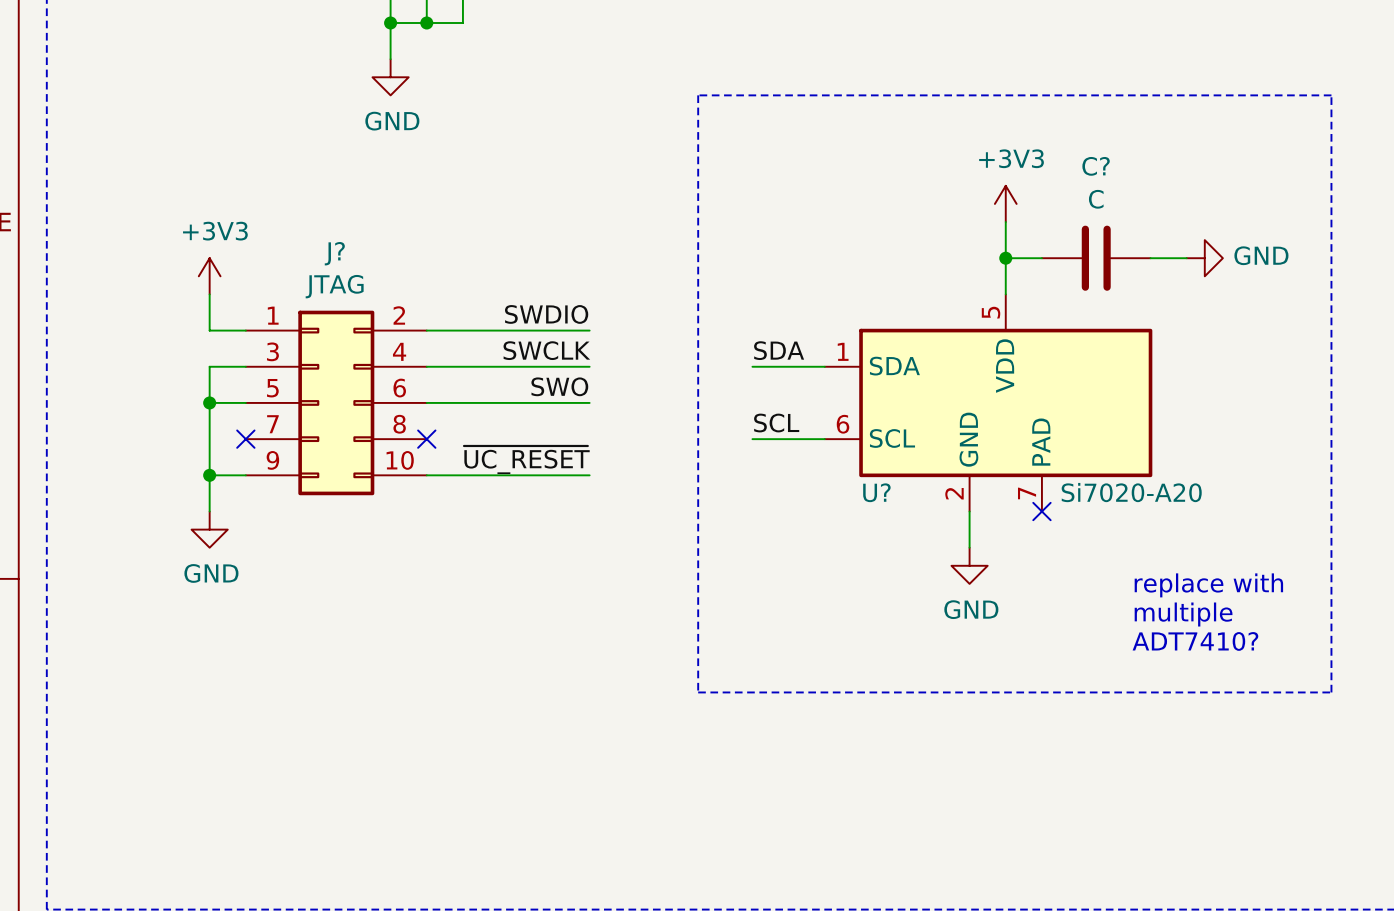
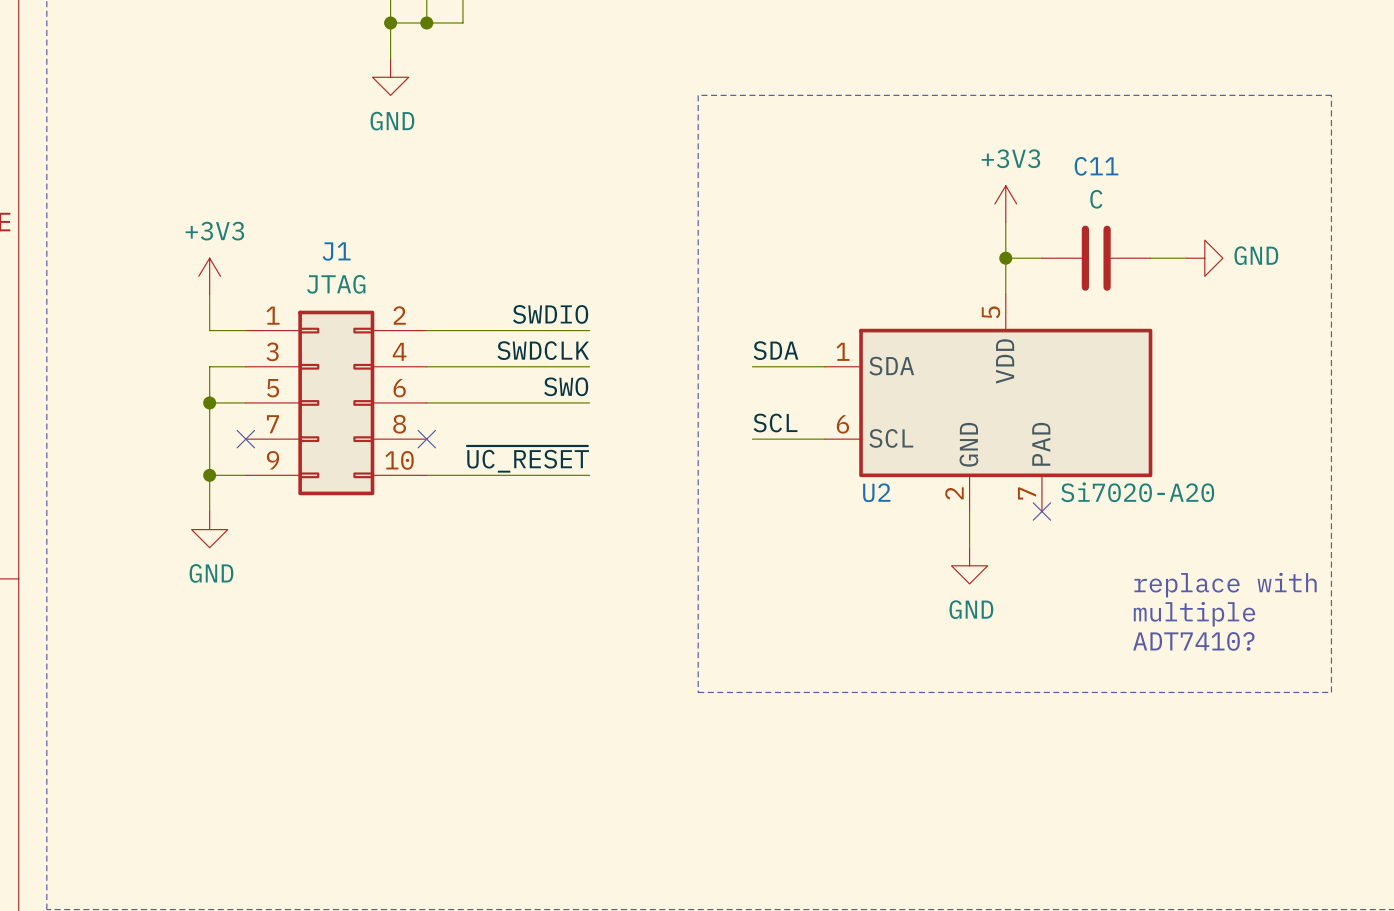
C? name: C? (1096, 166) -> C11 (1096, 166)
J? name: J? (334, 253) -> J1 (336, 251)
label: SWCLK (546, 350) -> SWDCLK (543, 350)
U? name: U? (876, 492) -> U2 (876, 492)

